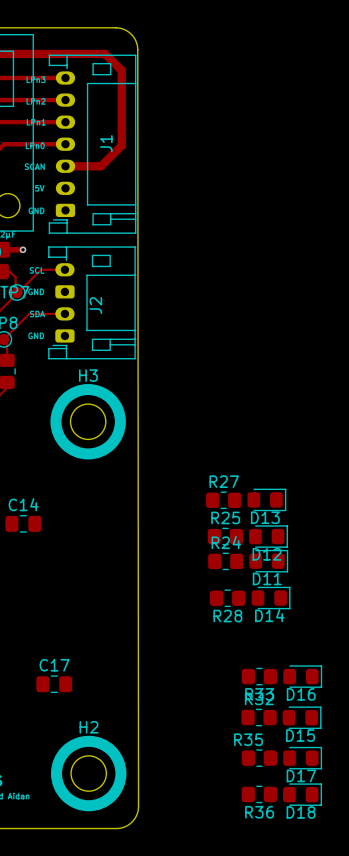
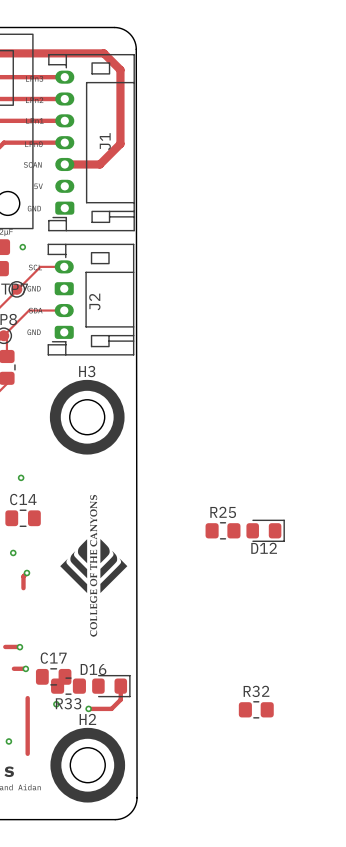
track: (3, 249) (23, 249) -> none
track: (2, 271) (9, 271) (15, 277) (15, 295) -> none
via: none -> (21, 477)
D13: (266, 499) -> none
drawing: none -> [60, 494, 128, 637]
R27: (223, 500) -> none
via: none -> (13, 552)
R24: (225, 561) -> none
D11: (268, 561) -> none
track: none -> (26, 572) (23, 576) (23, 588)
via: none -> (26, 572)
R28: (227, 598) -> none
D14: (271, 598) -> none
track: none -> (5, 646) (19, 647)
via: none -> (19, 647)
track: none -> (13, 668) (25, 668)
via: none -> (25, 668)
R33 position: (259, 676) -> (68, 686)
D16 position: (302, 676) -> (111, 686)
track: none -> (119, 686) (120, 699) (111, 708) (88, 708)
D16 name position: D16 (301, 694) -> D16 (93, 669)
track: none -> (27, 698) (27, 753)
via: none -> (56, 704)
via: none -> (88, 708)
D15: (302, 717) -> none
via: none -> (8, 741)
R35: (259, 758) -> none
D17: (302, 758) -> none
R36: (259, 794) -> none
D18: (302, 794) -> none

